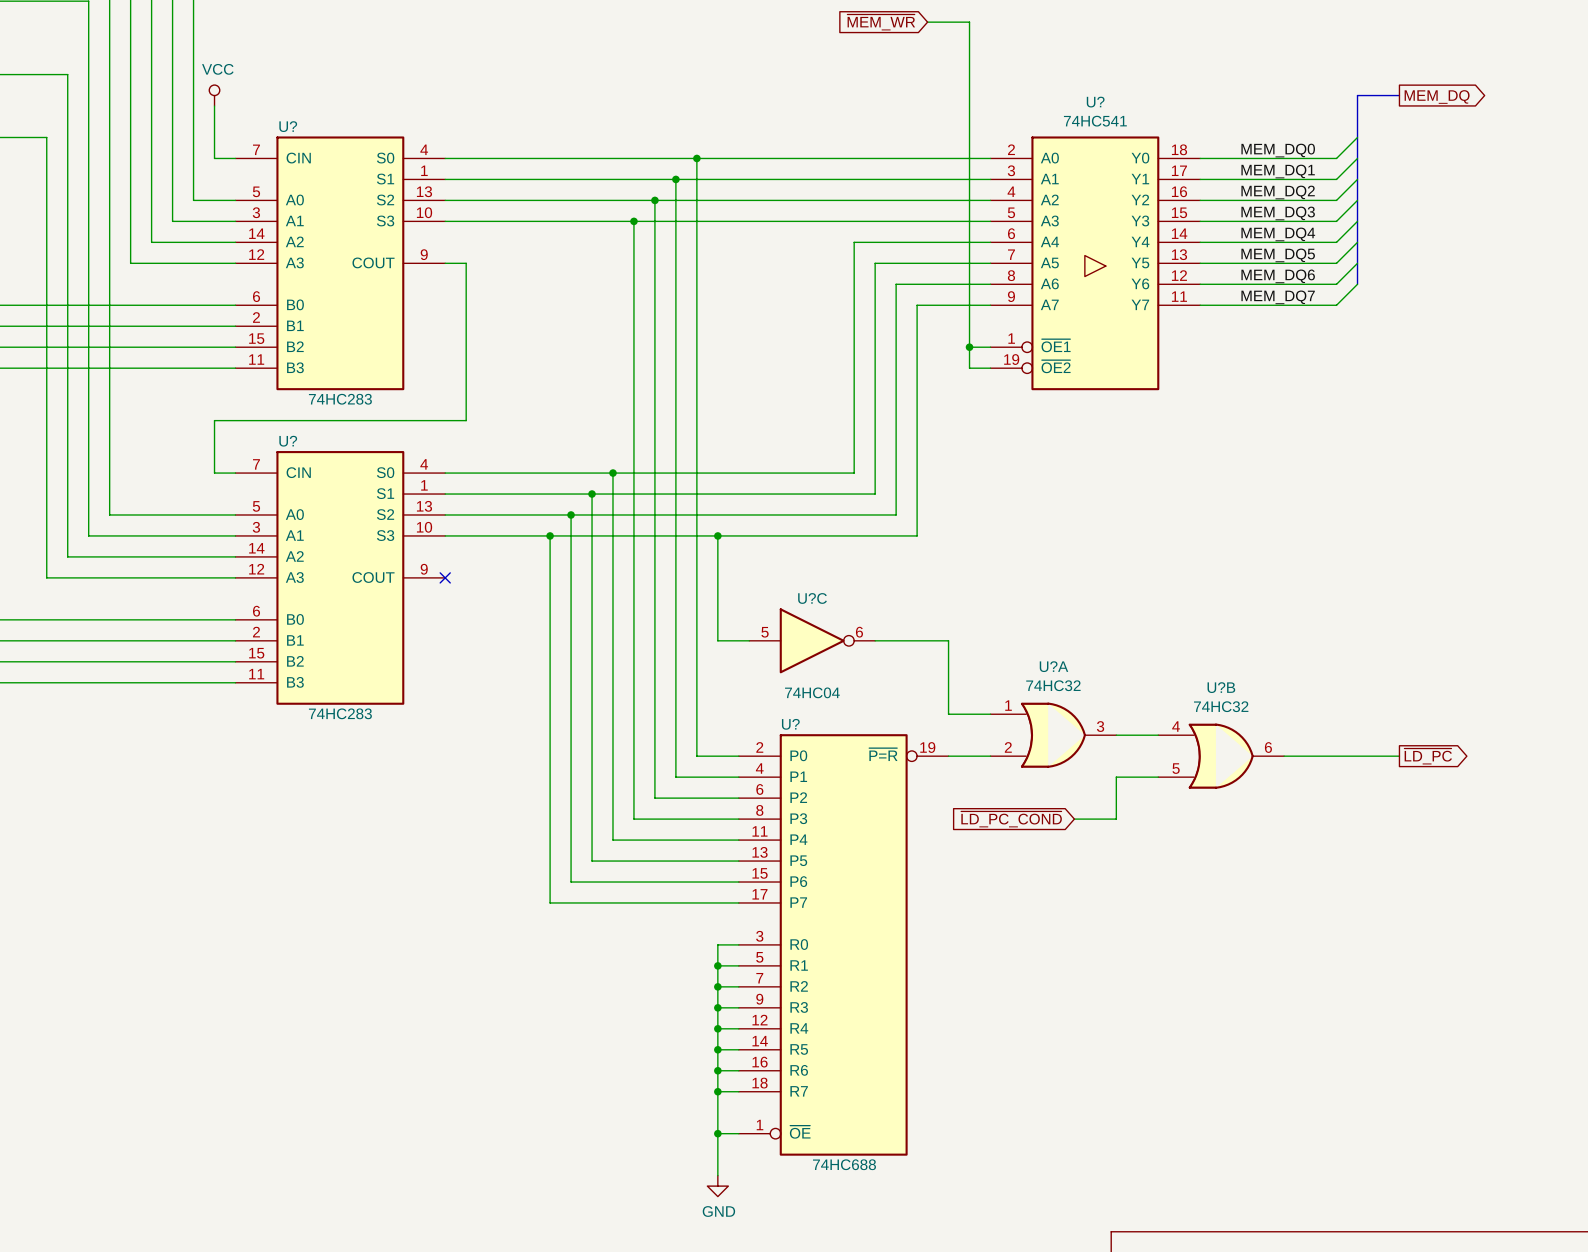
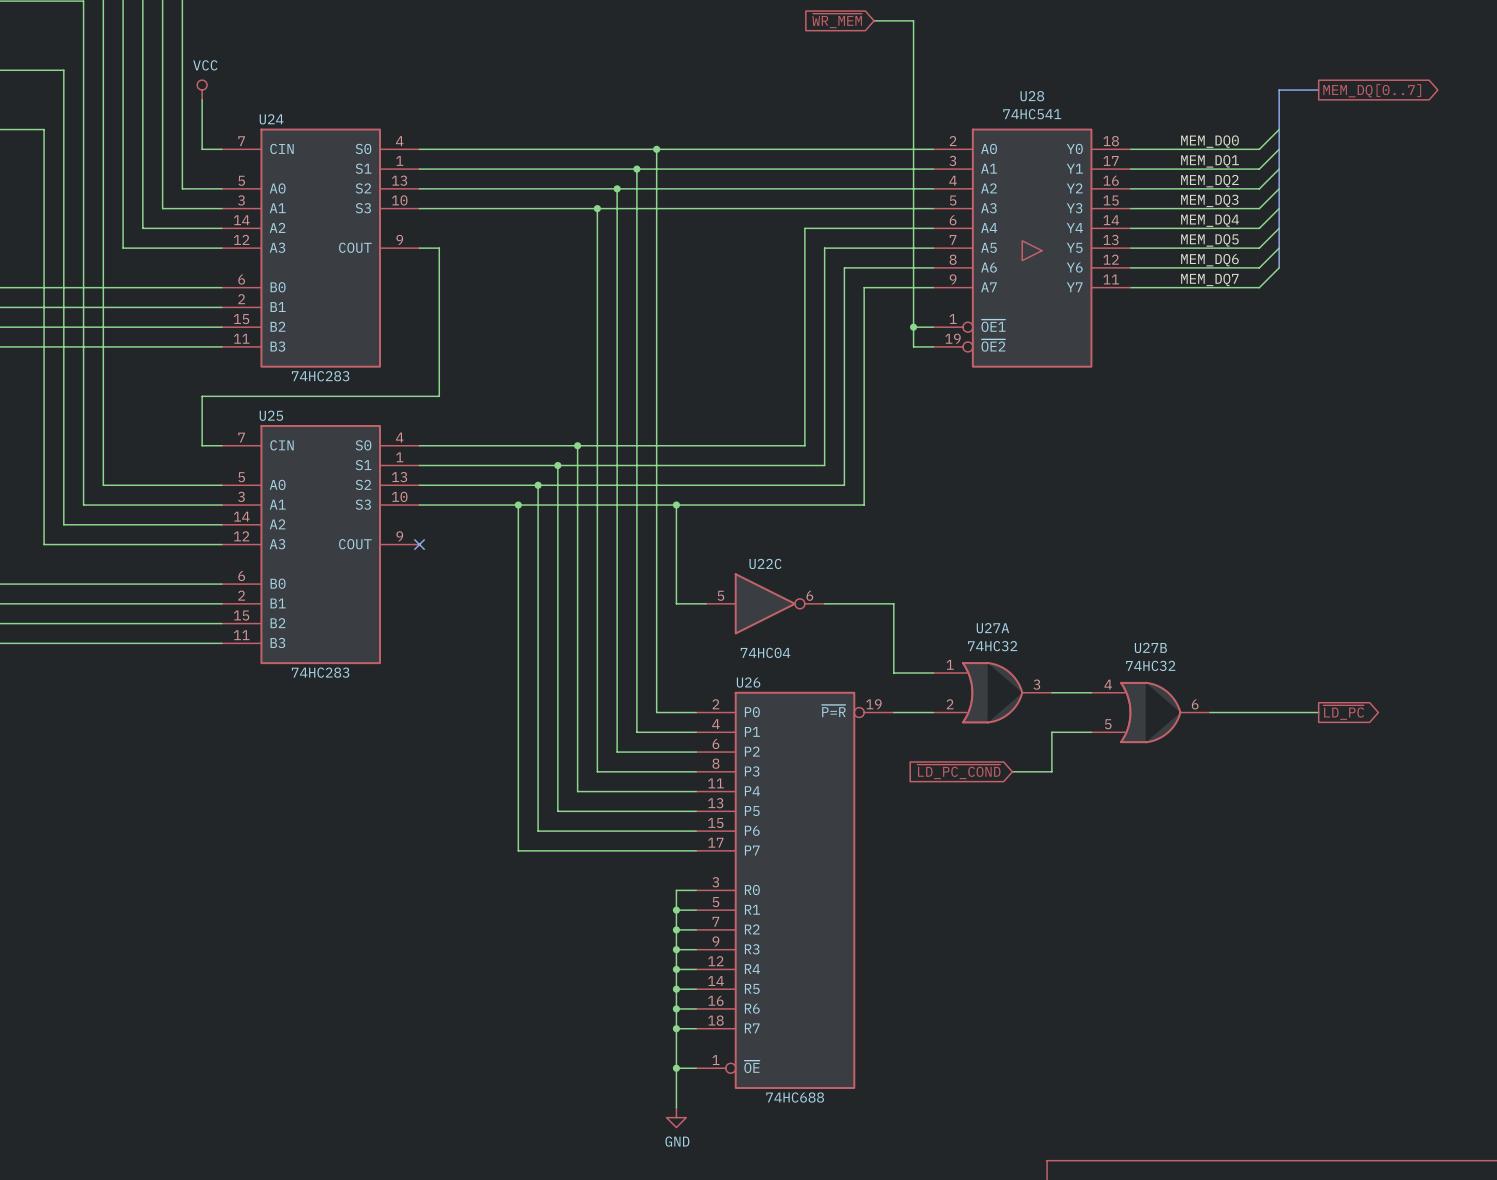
global label: ~{MEM_WR} (881, 22) -> ~{WR_MEM} (837, 20)
global label: MEM_DQ (1437, 96) -> MEM_DQ[0..7] (1372, 90)
U? name: U? (1095, 102) -> U28 (1032, 96)
U? name: U? (288, 126) -> U24 (271, 119)
U? name: U? (288, 441) -> U25 (271, 415)
U?C name: U?C (812, 598) -> U22C (765, 563)
U?A name: U?A (1053, 666) -> U27A (992, 628)
U?B name: U?B (1221, 687) -> U27B (1150, 647)
U? name: U? (790, 724) -> U26 (748, 682)

